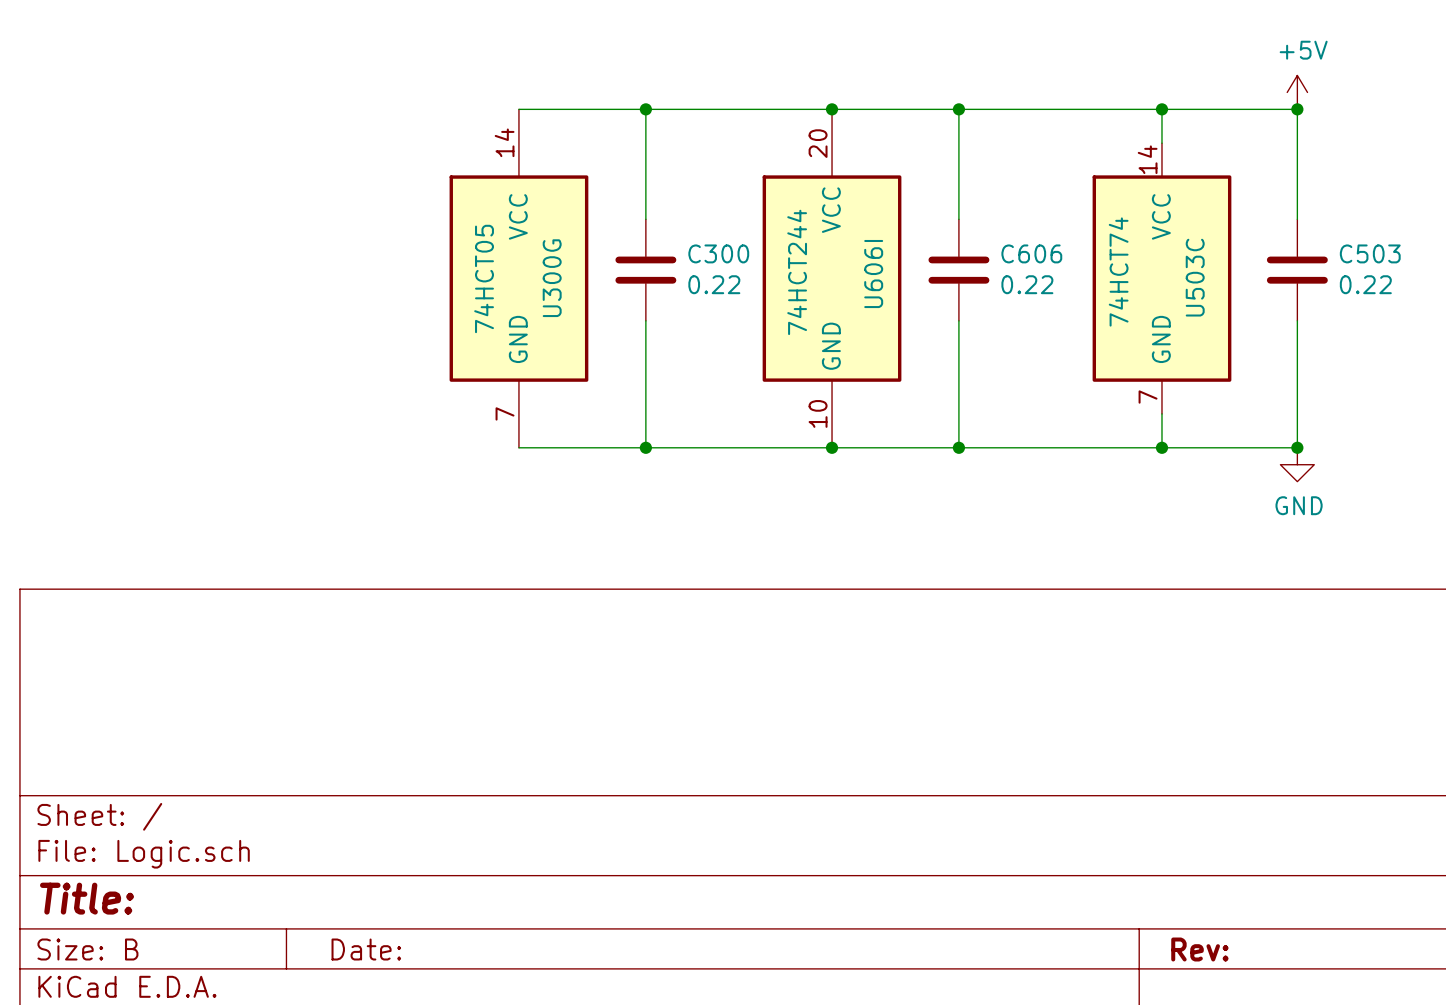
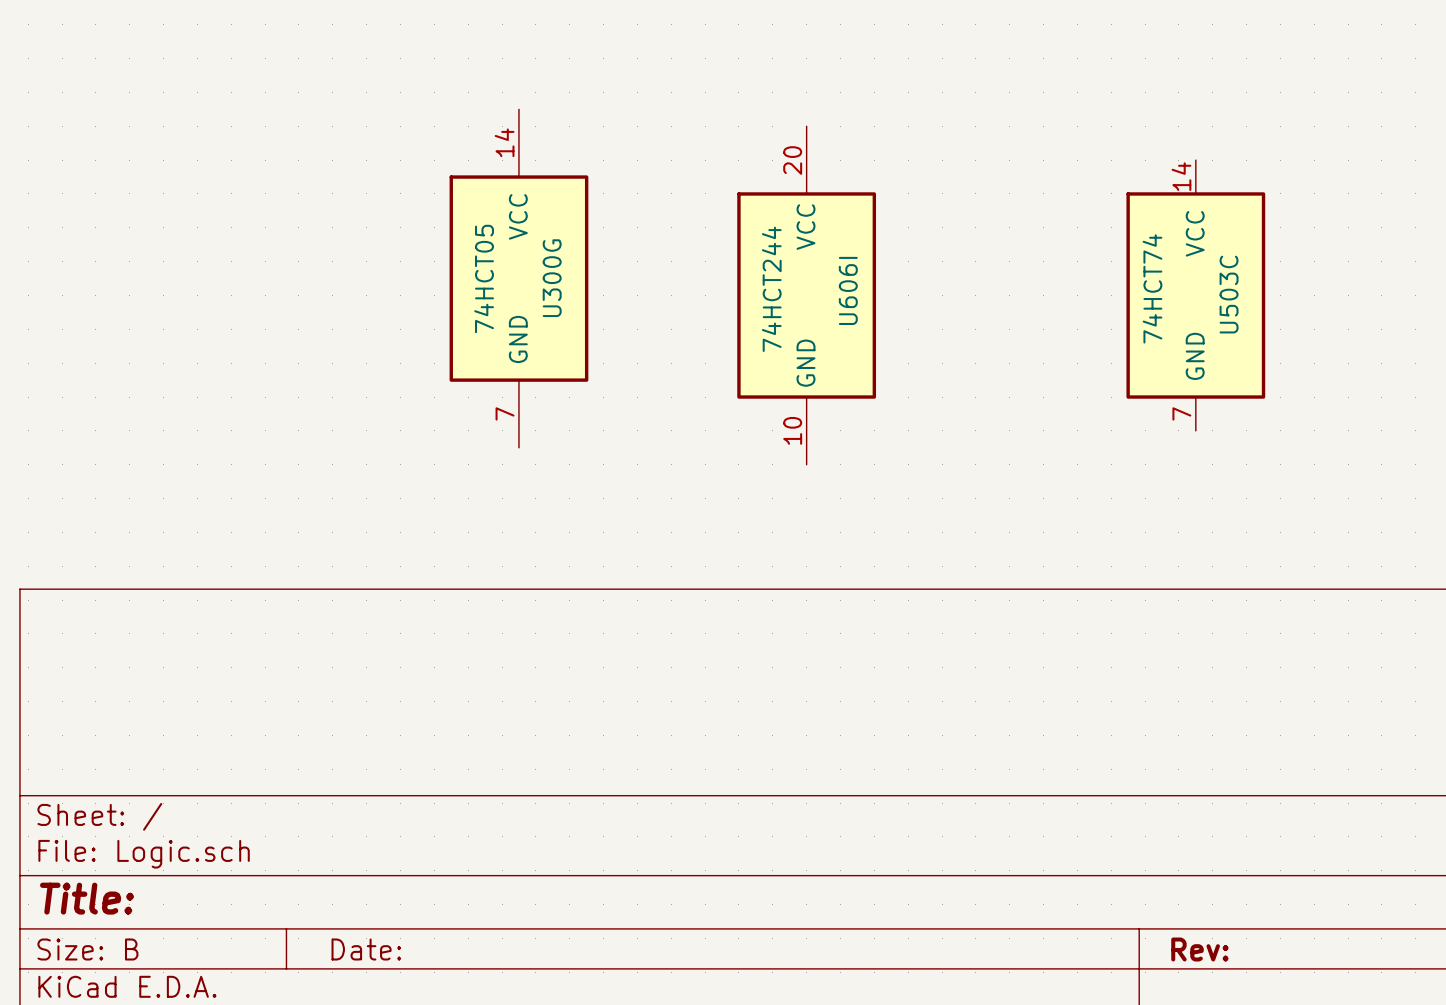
power symbol: +5V (1297, 92) -> none
wire: (518, 109) (1297, 109) (1297, 219) -> none
wire: (645, 109) (645, 219) -> none
junction: (645, 109) -> none
junction: (832, 109) -> none
wire: (958, 109) (958, 219) -> none
junction: (958, 109) -> none
wire: (1161, 109) (1161, 143) -> none
junction: (1161, 109) -> none
junction: (1297, 109) -> none
C300: 0.22 (645, 270) -> none
C606: 0.22 (958, 270) -> none
C503: 0.22 (1297, 270) -> none
U606I position: (832, 278) -> (806, 295)
U503C position: (1161, 278) -> (1195, 295)
wire: (645, 320) (645, 447) -> none
wire: (958, 320) (958, 447) -> none
wire: (1297, 320) (1297, 447) (518, 447) -> none
wire: (1161, 413) (1161, 447) -> none
junction: (645, 447) -> none
junction: (832, 447) -> none
junction: (958, 447) -> none
junction: (1161, 447) -> none
junction: (1297, 447) -> none
power symbol: GND (1297, 464) -> none

